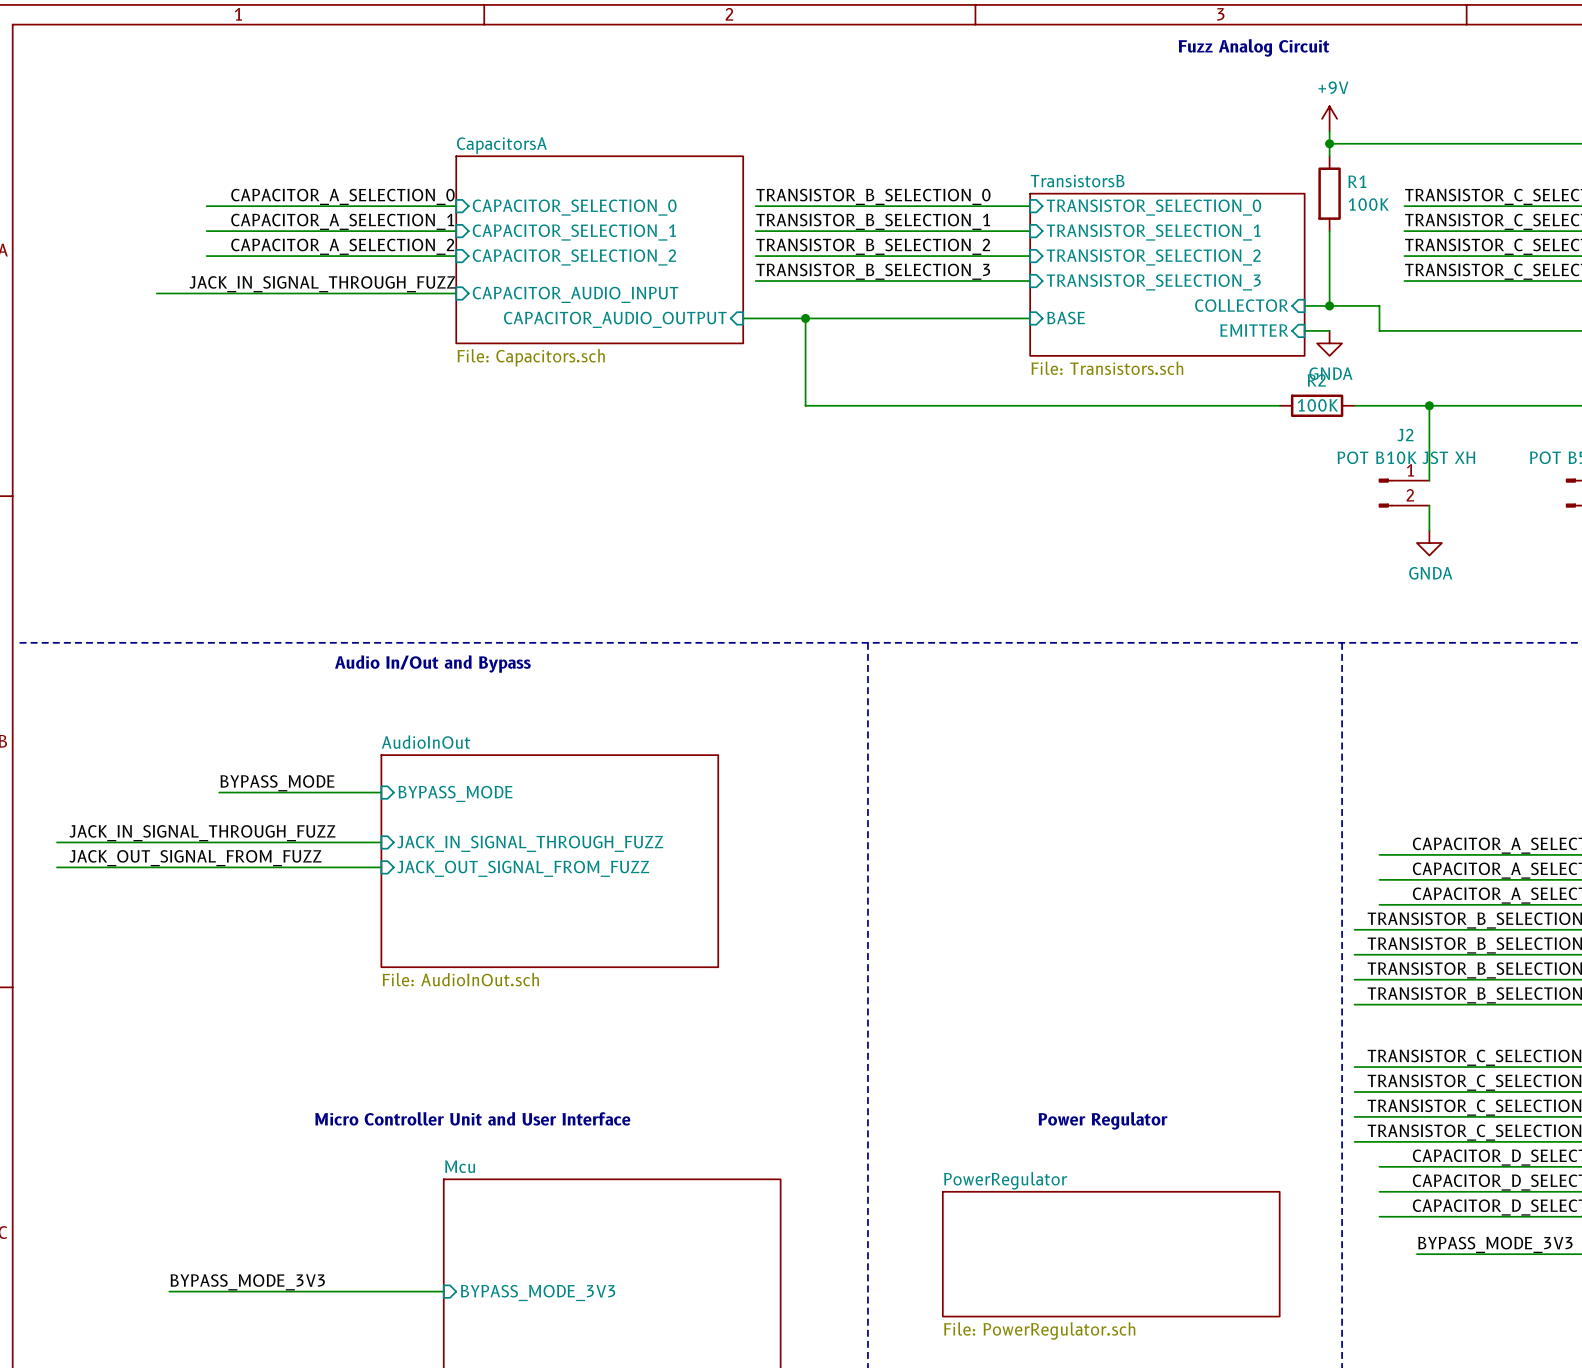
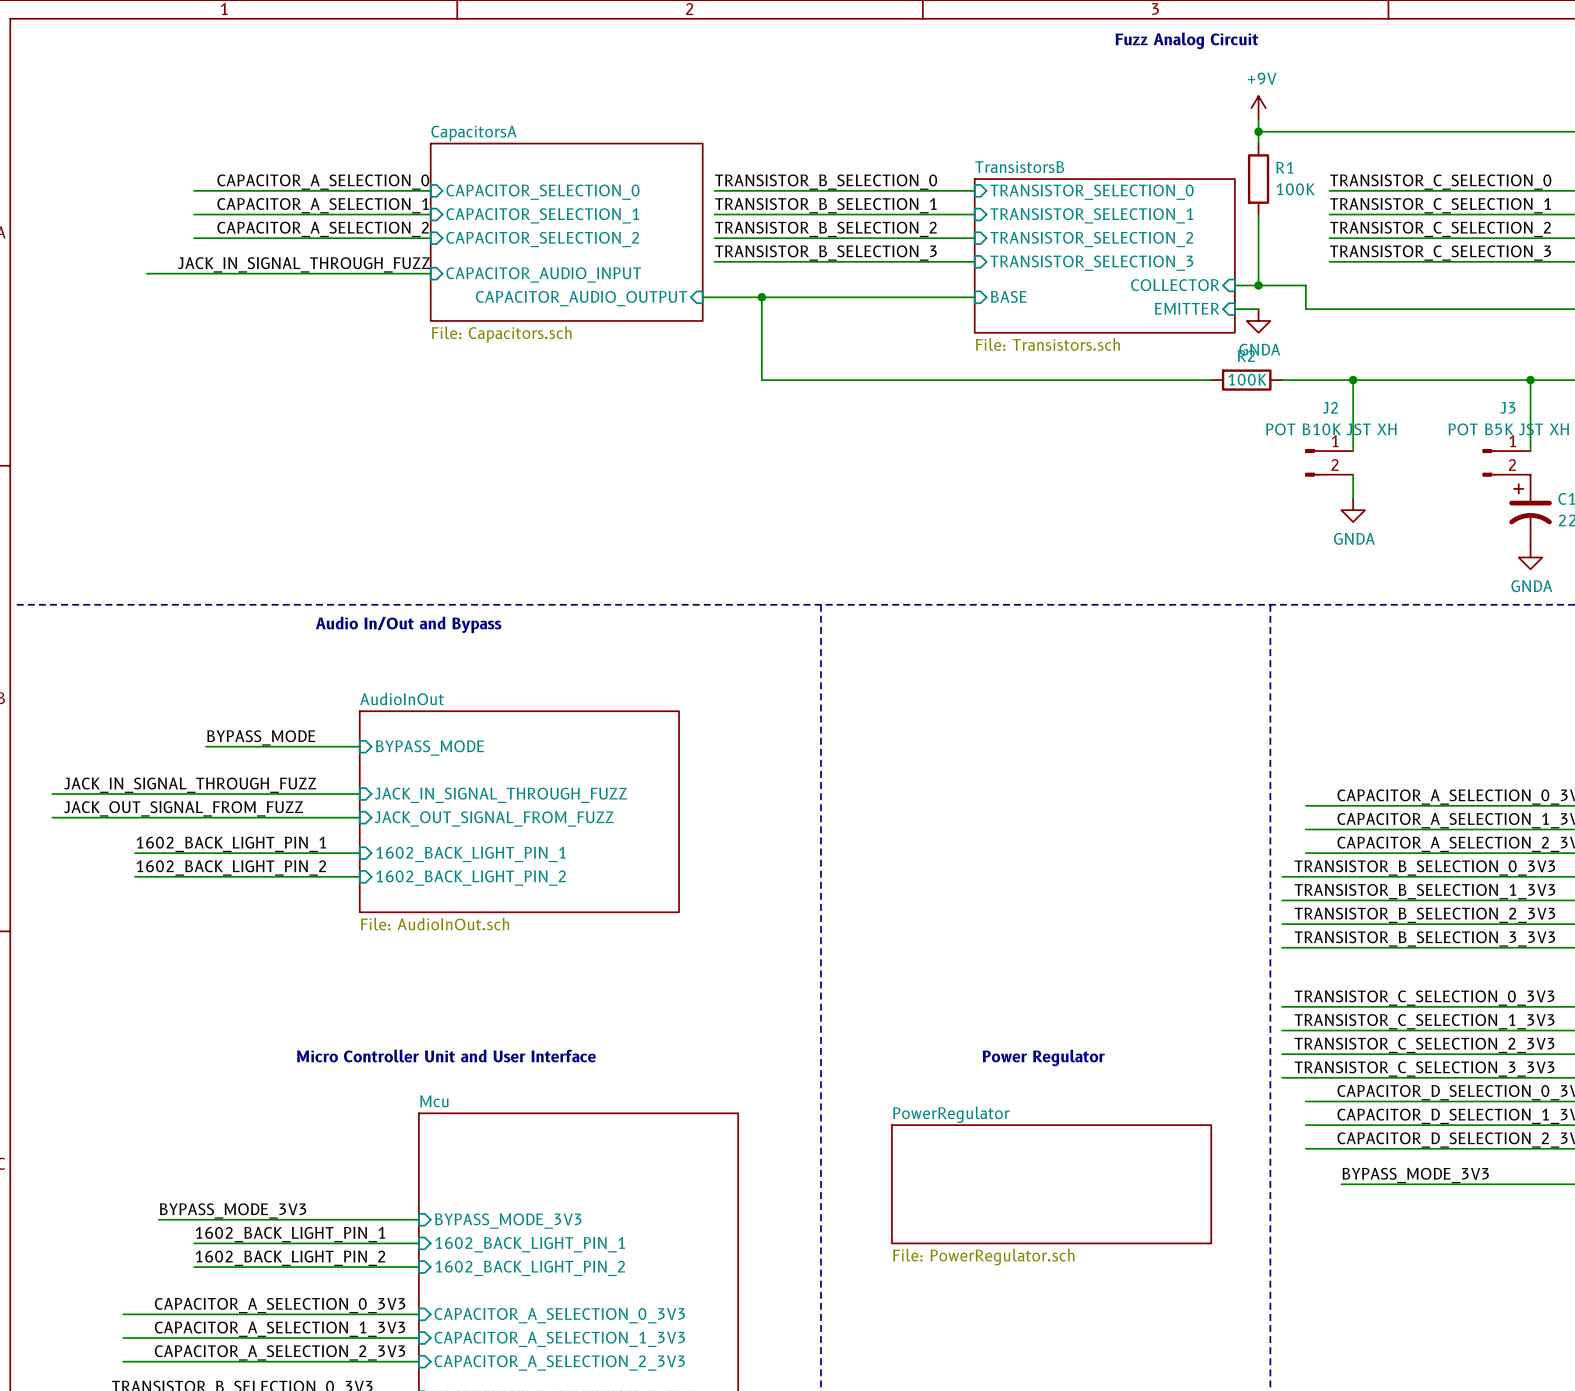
label: none -> 1602_BACK_LIGHT_PIN_1 (231, 844)
wire: none -> (135, 853) (359, 853)
sheet pin: none -> 1602_BACK_LIGHT_PIN_1 (471, 854)
label: none -> 1602_BACK_LIGHT_PIN_2 (231, 868)
wire: none -> (135, 876) (359, 876)
sheet pin: none -> 1602_BACK_LIGHT_PIN_2 (471, 878)
label: none -> 1602_BACK_LIGHT_PIN_1 (290, 1234)
wire: none -> (194, 1243) (418, 1243)
sheet pin: none -> 1602_BACK_LIGHT_PIN_1 (530, 1244)
label: none -> 1602_BACK_LIGHT_PIN_2 (290, 1258)
wire: none -> (194, 1267) (418, 1267)
sheet pin: none -> 1602_BACK_LIGHT_PIN_2 (530, 1268)

